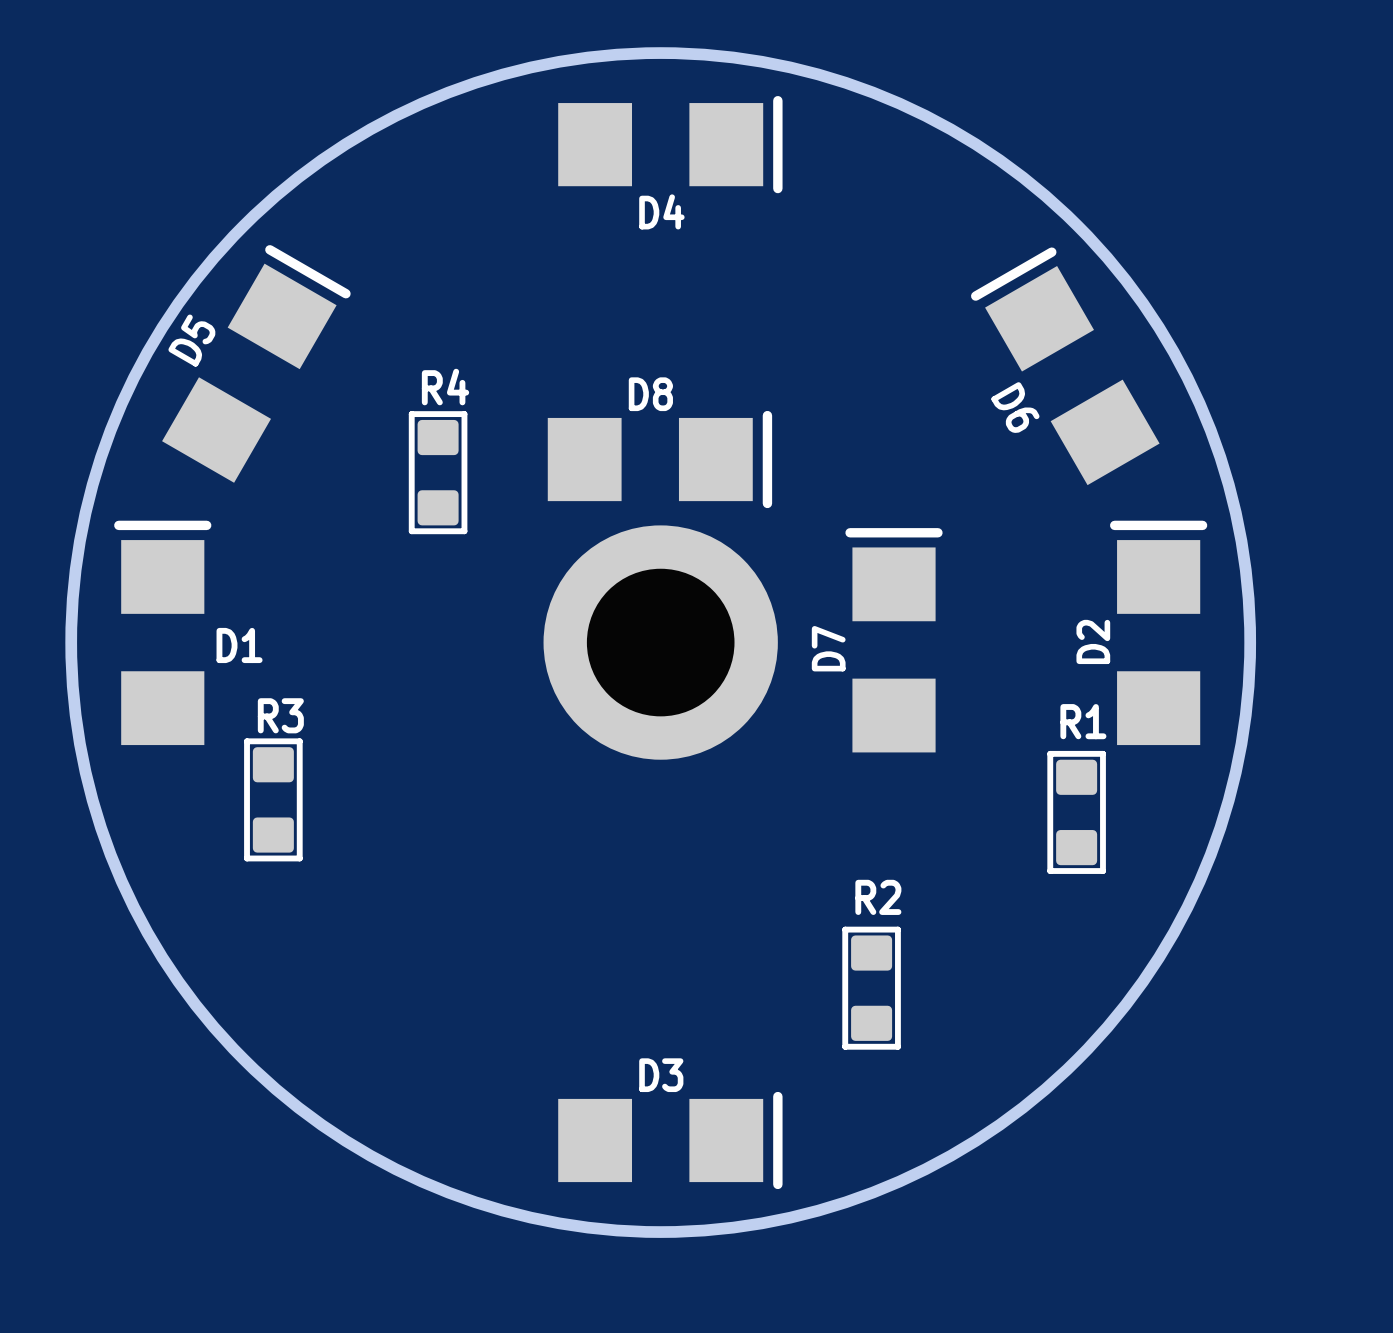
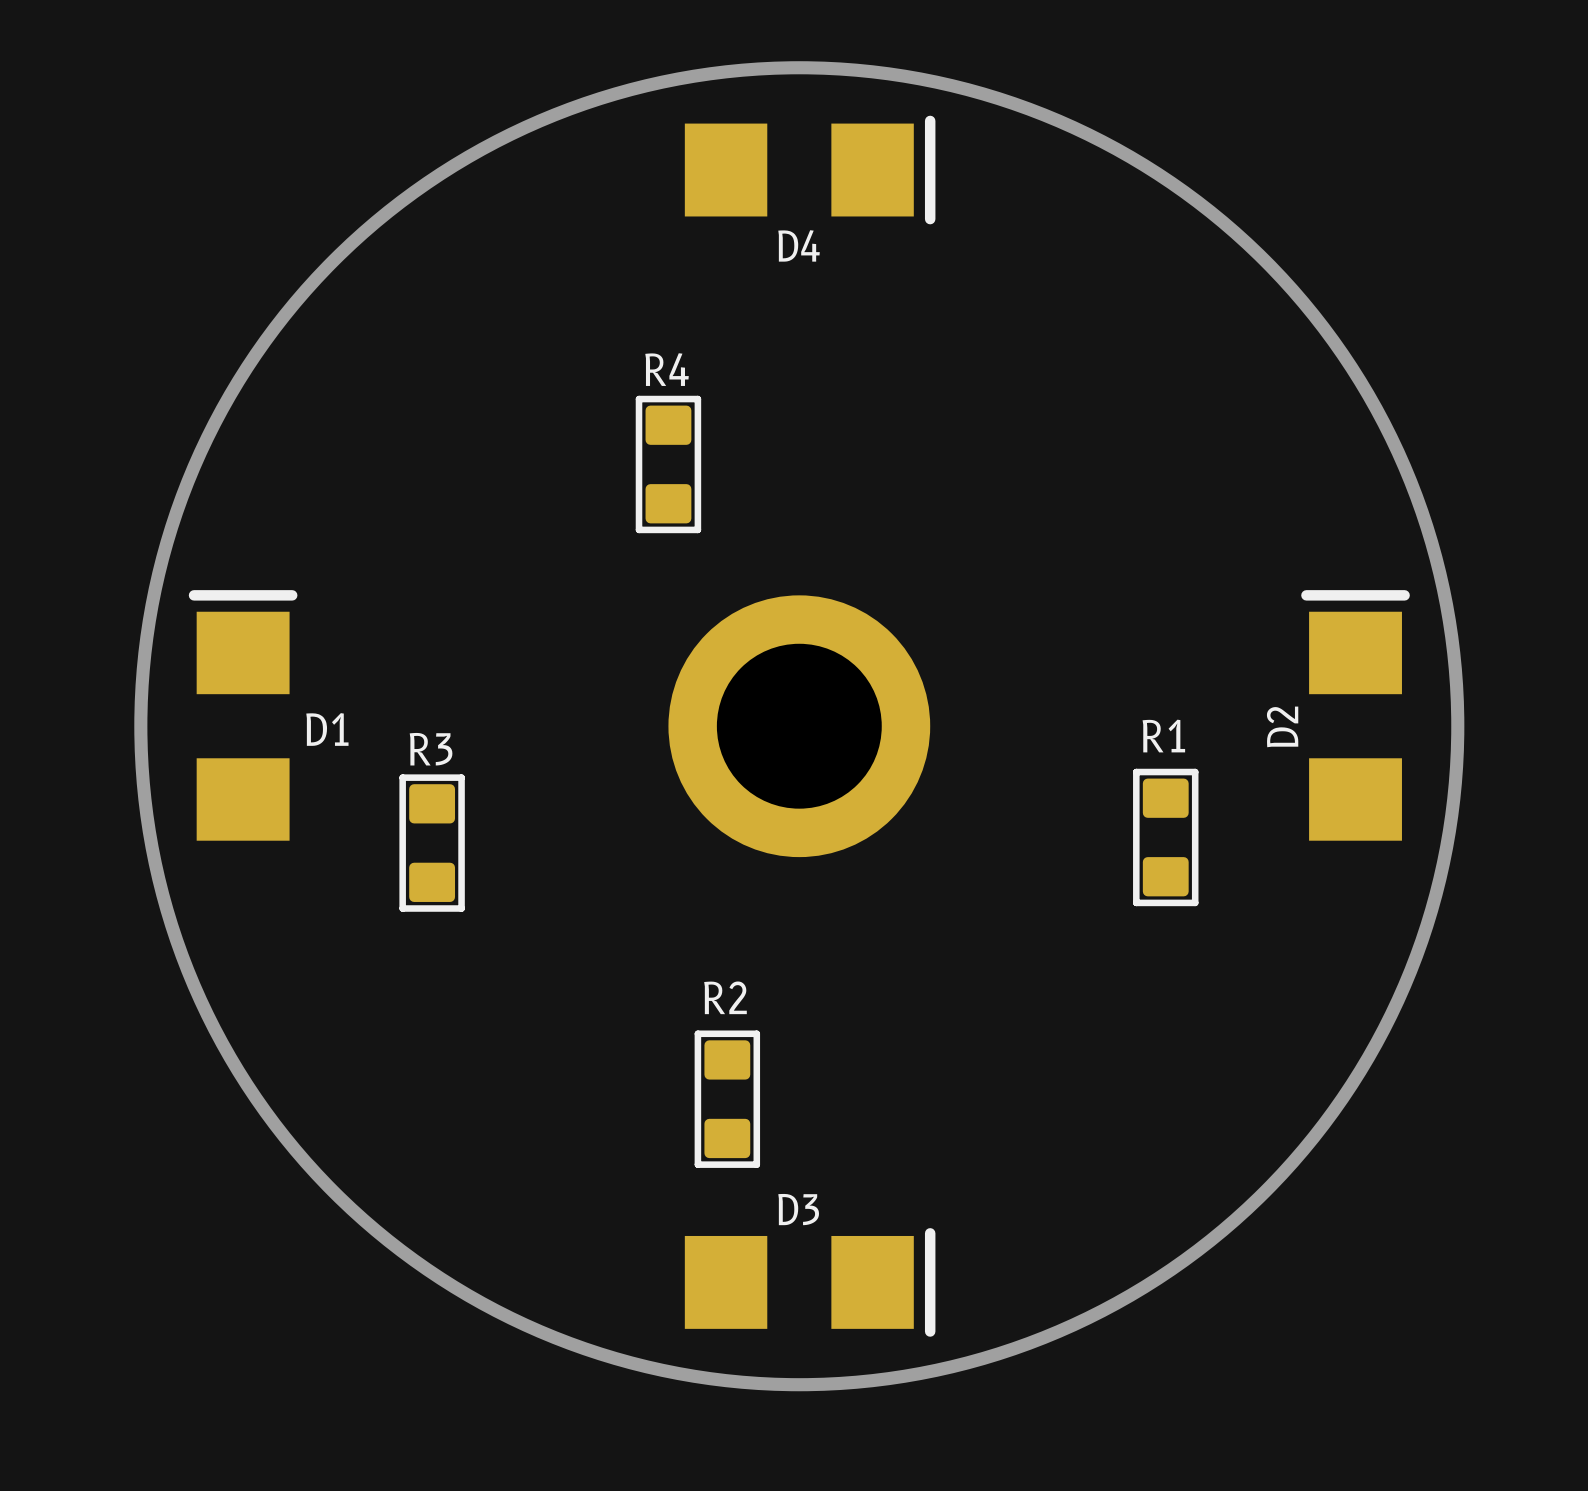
D5: (256, 363) -> none
D6: (1065, 366) -> none
D8: (659, 459) -> none
R4 position: (438, 472) -> (668, 464)
D7: (894, 640) -> none
R3 position: (273, 799) -> (432, 843)
R1 position: (1076, 812) -> (1165, 837)
R2 position: (871, 988) -> (727, 1099)

